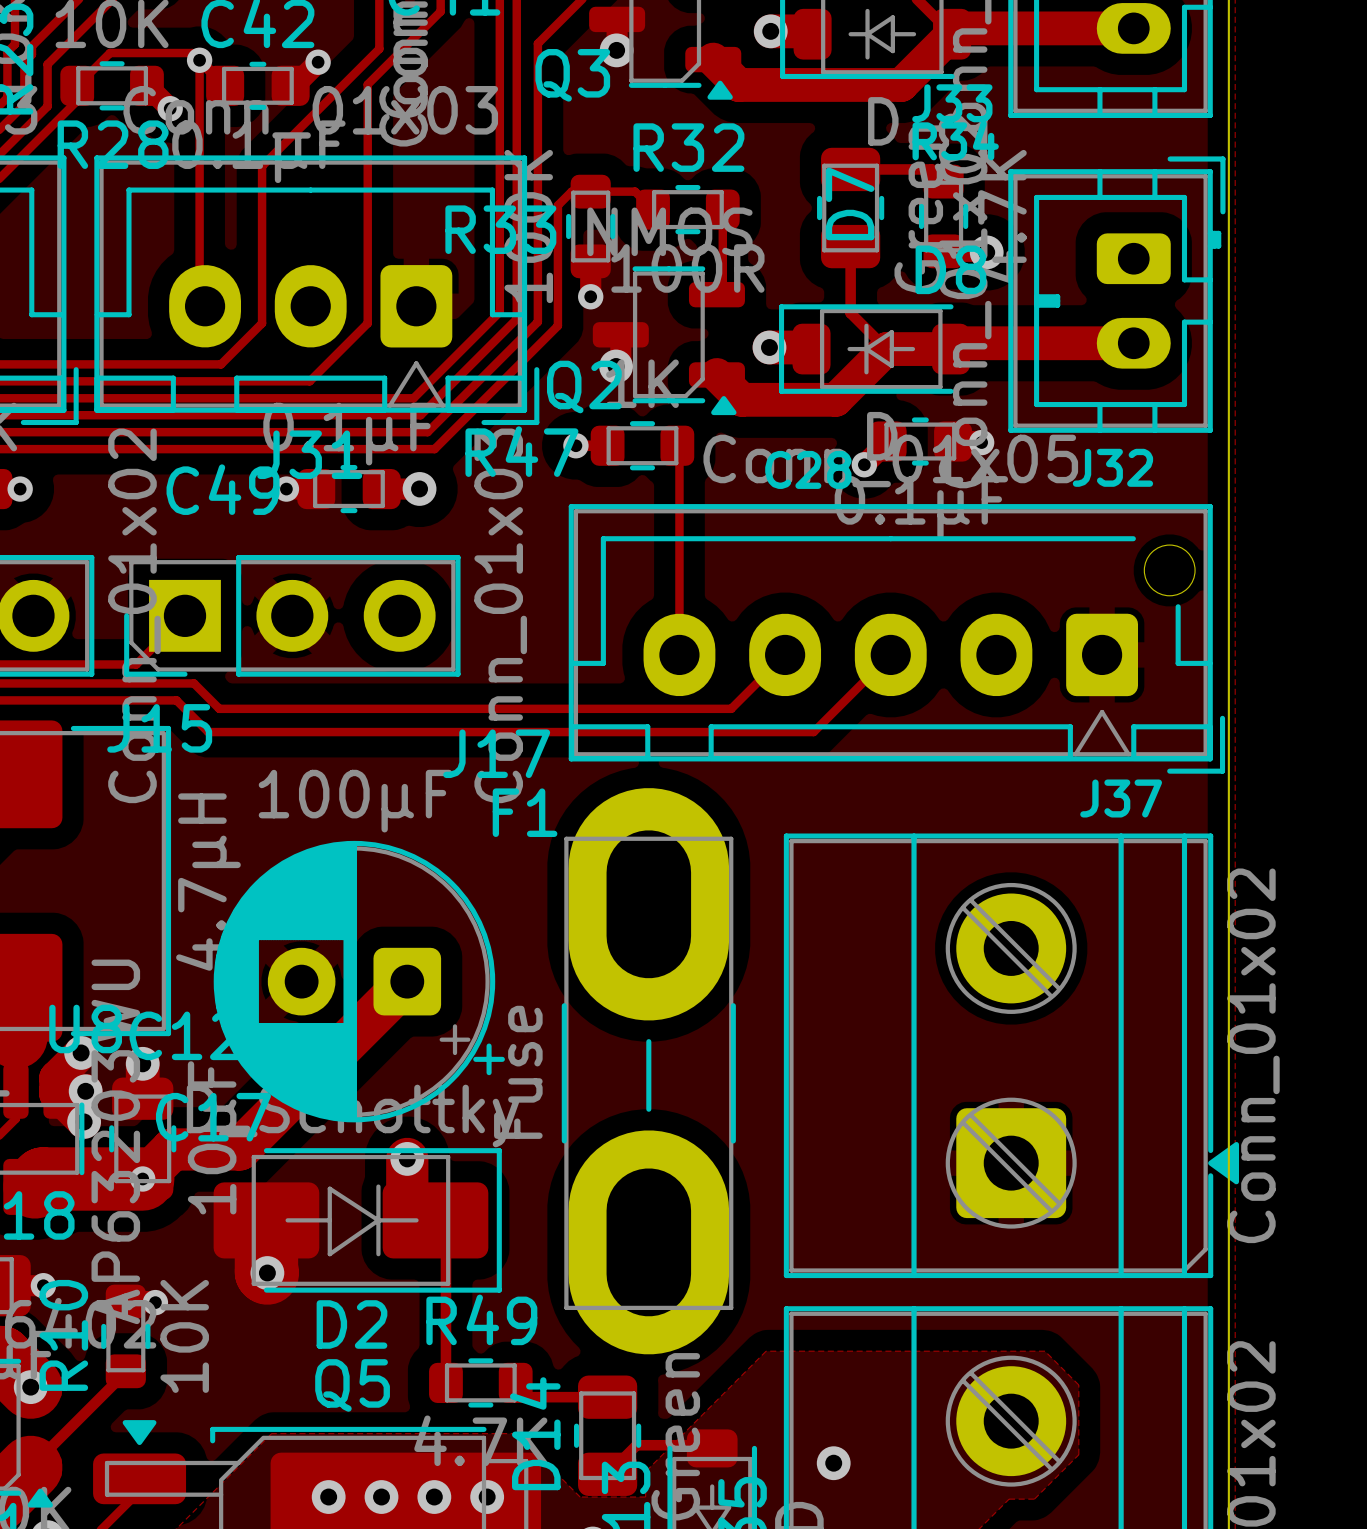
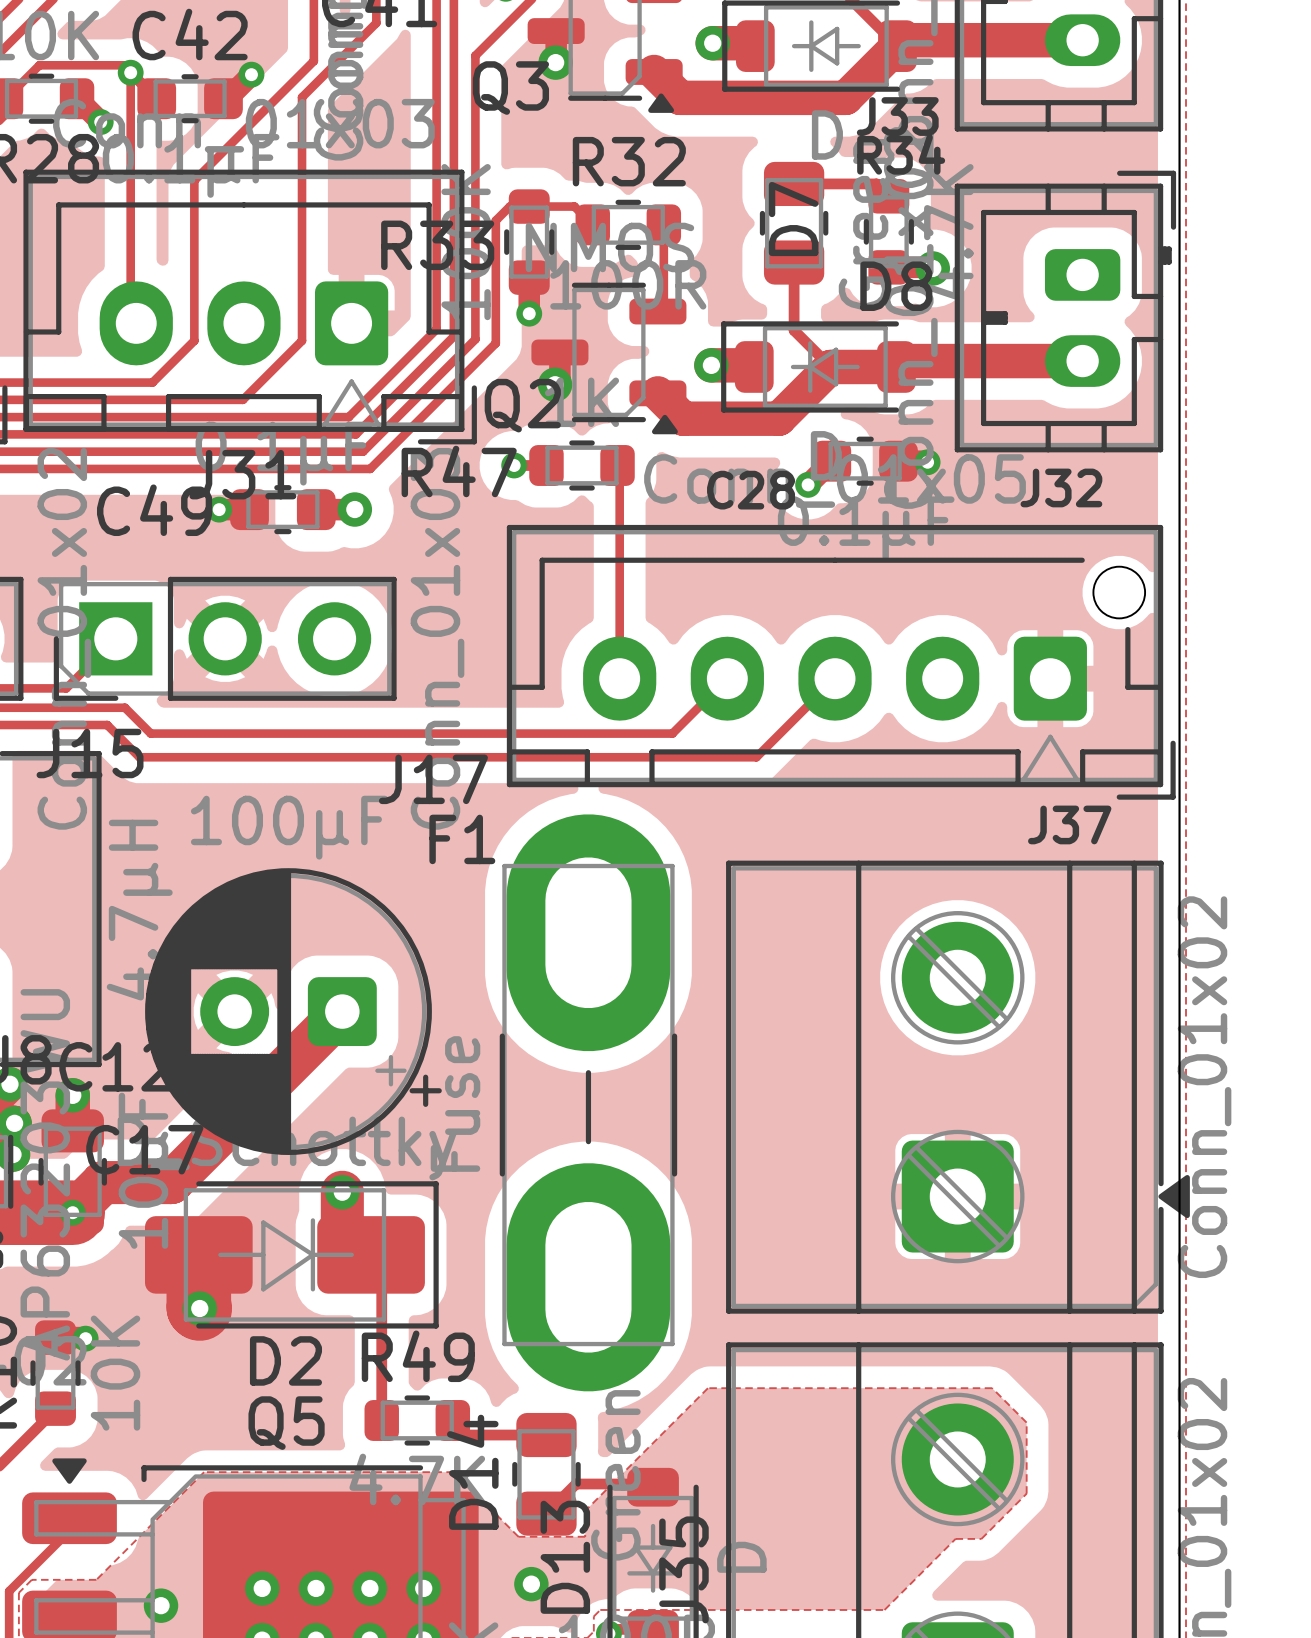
via: (833, 1463) -> none
via: (328, 1497) -> none
via: (381, 1497) -> none
via: (434, 1497) -> none
via: (487, 1497) -> none

